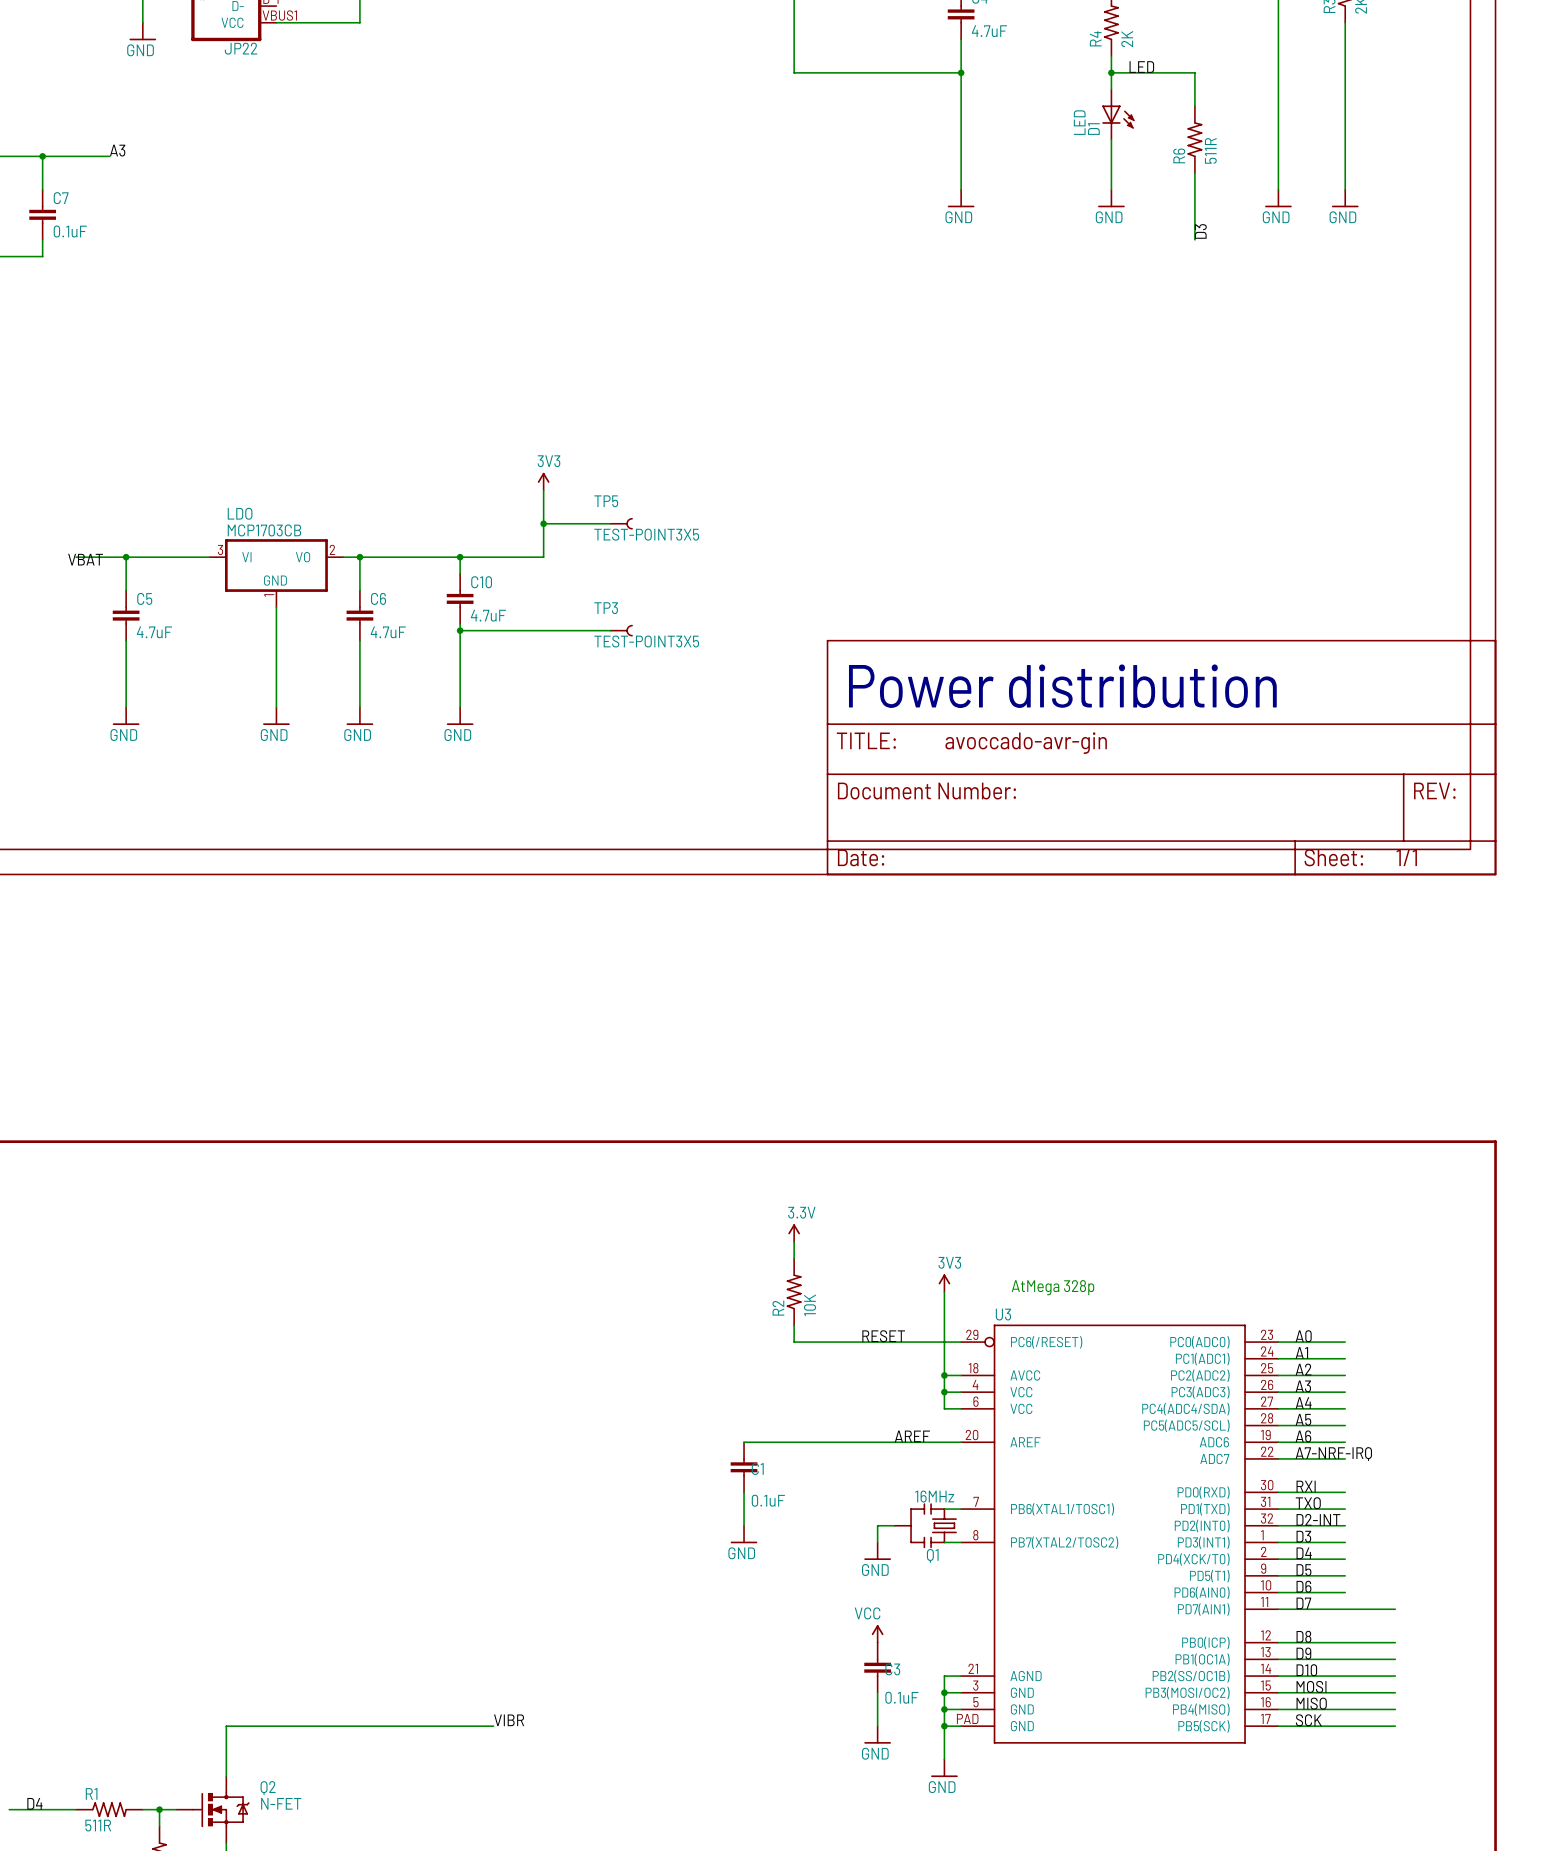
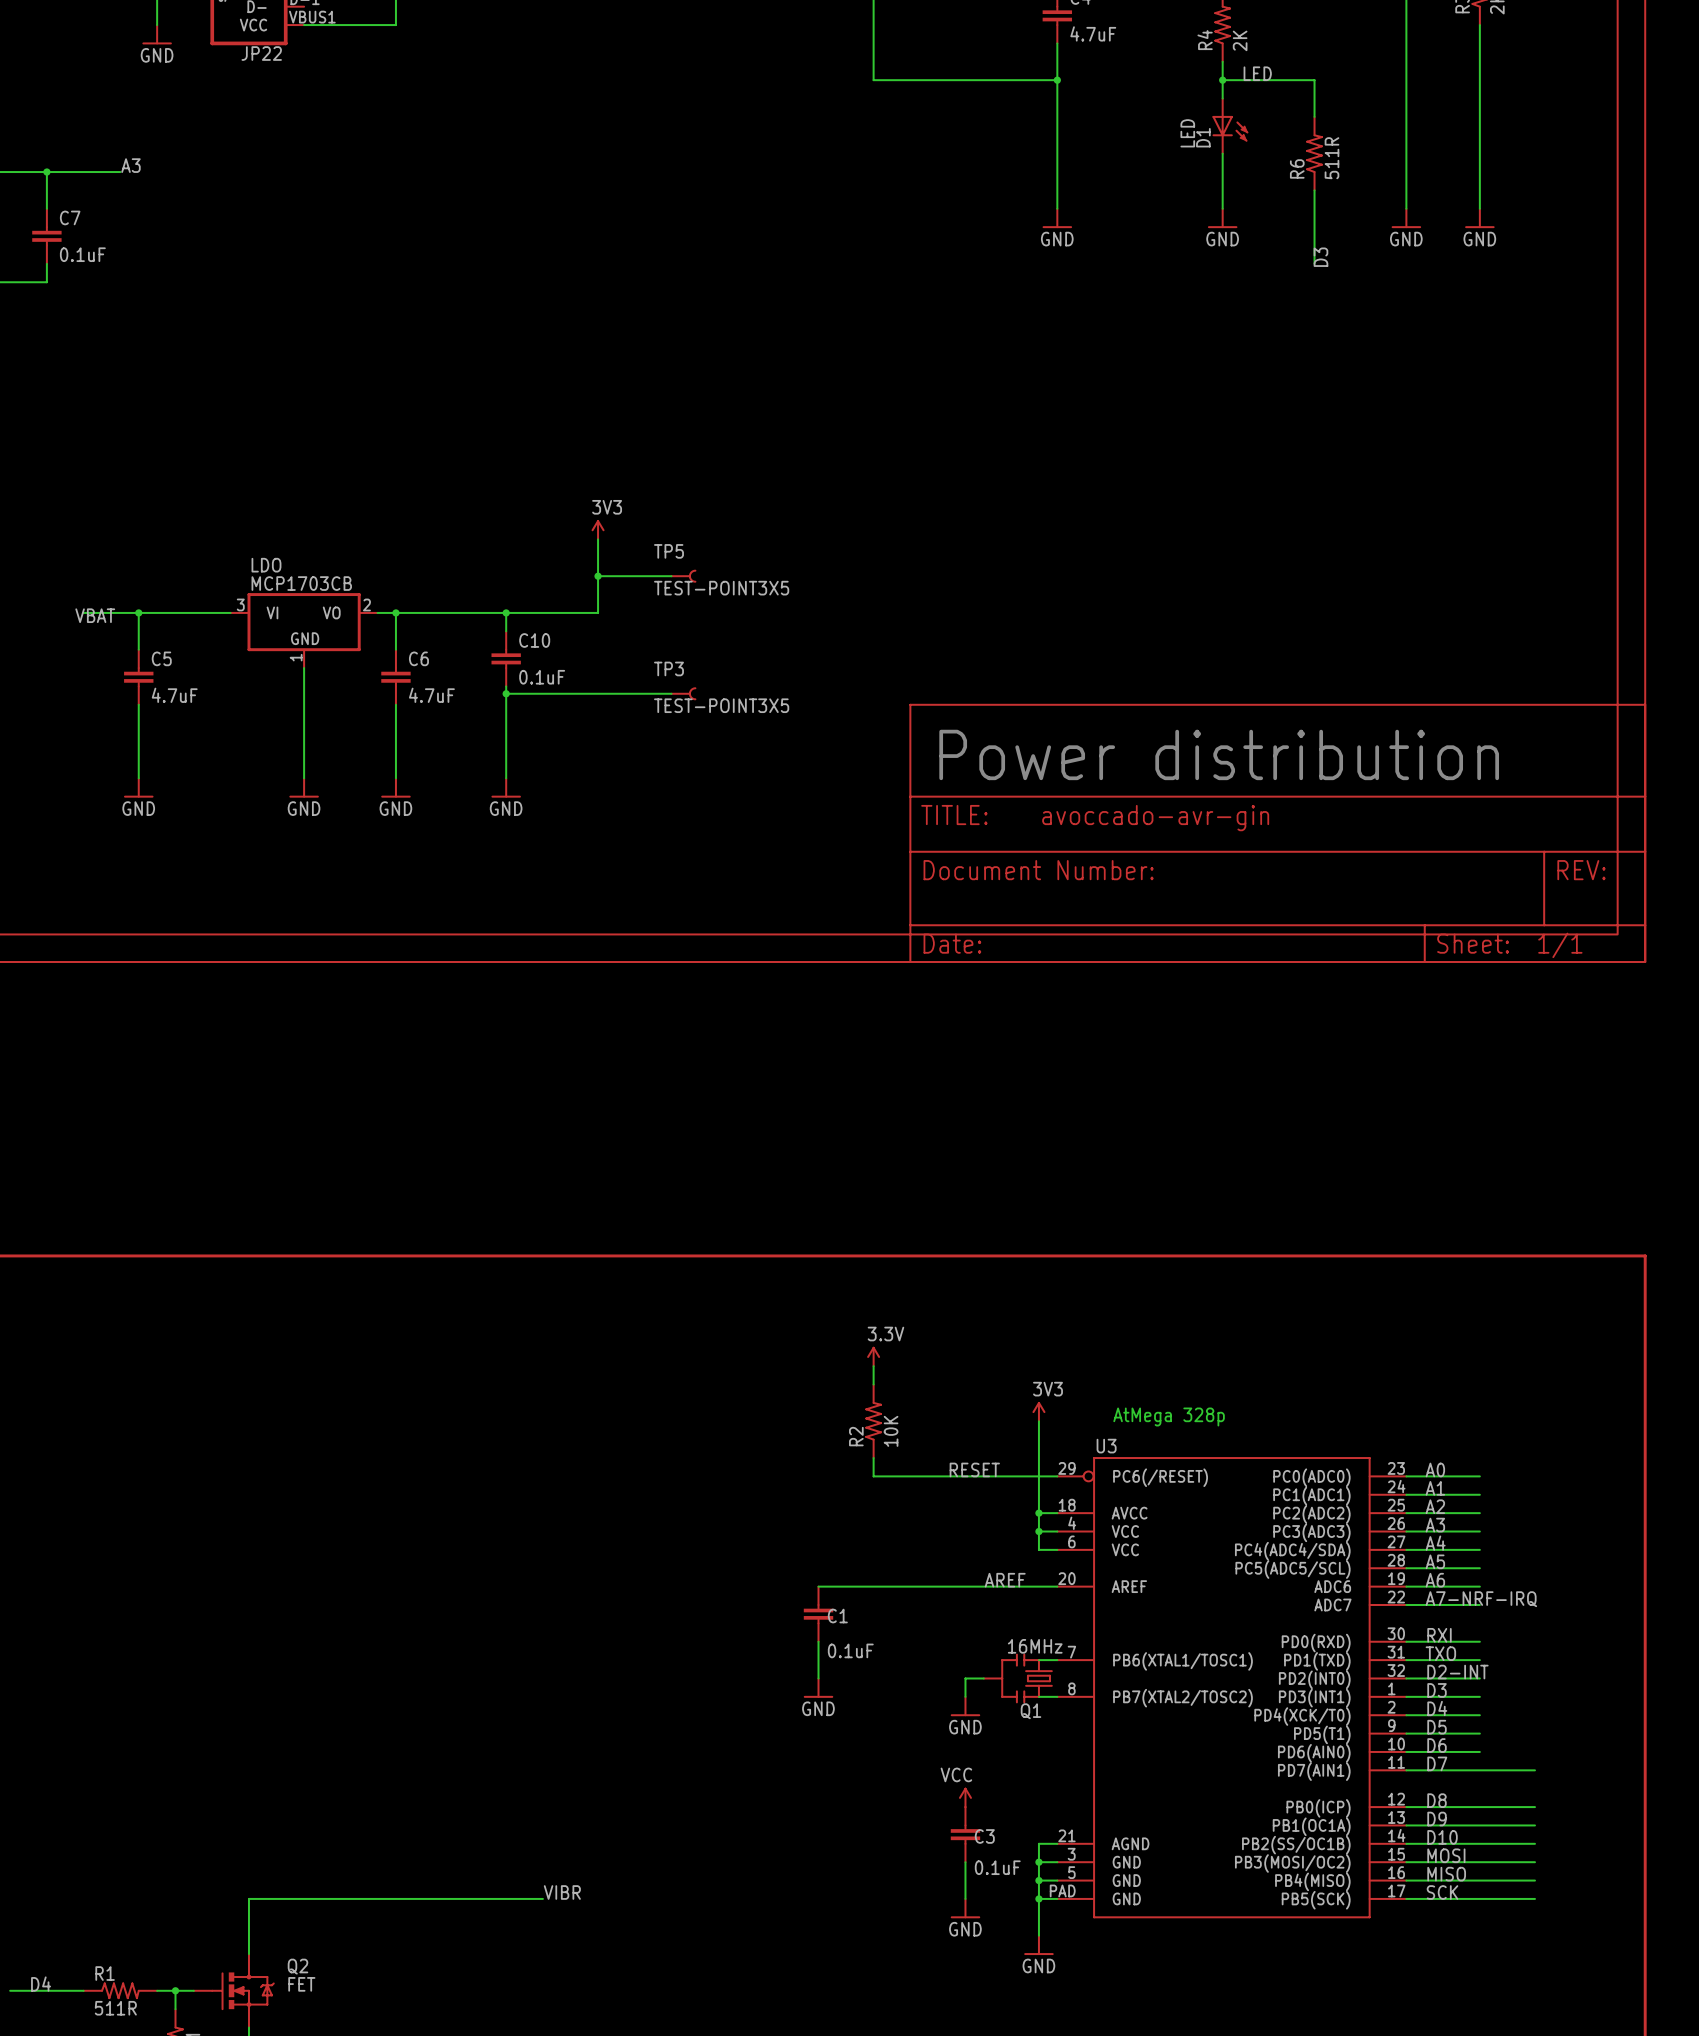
C10 value: 4.7uF (488, 615) -> 0.1uF (542, 677)
Q2 value: N-FET (281, 1803) -> FET (301, 1984)

